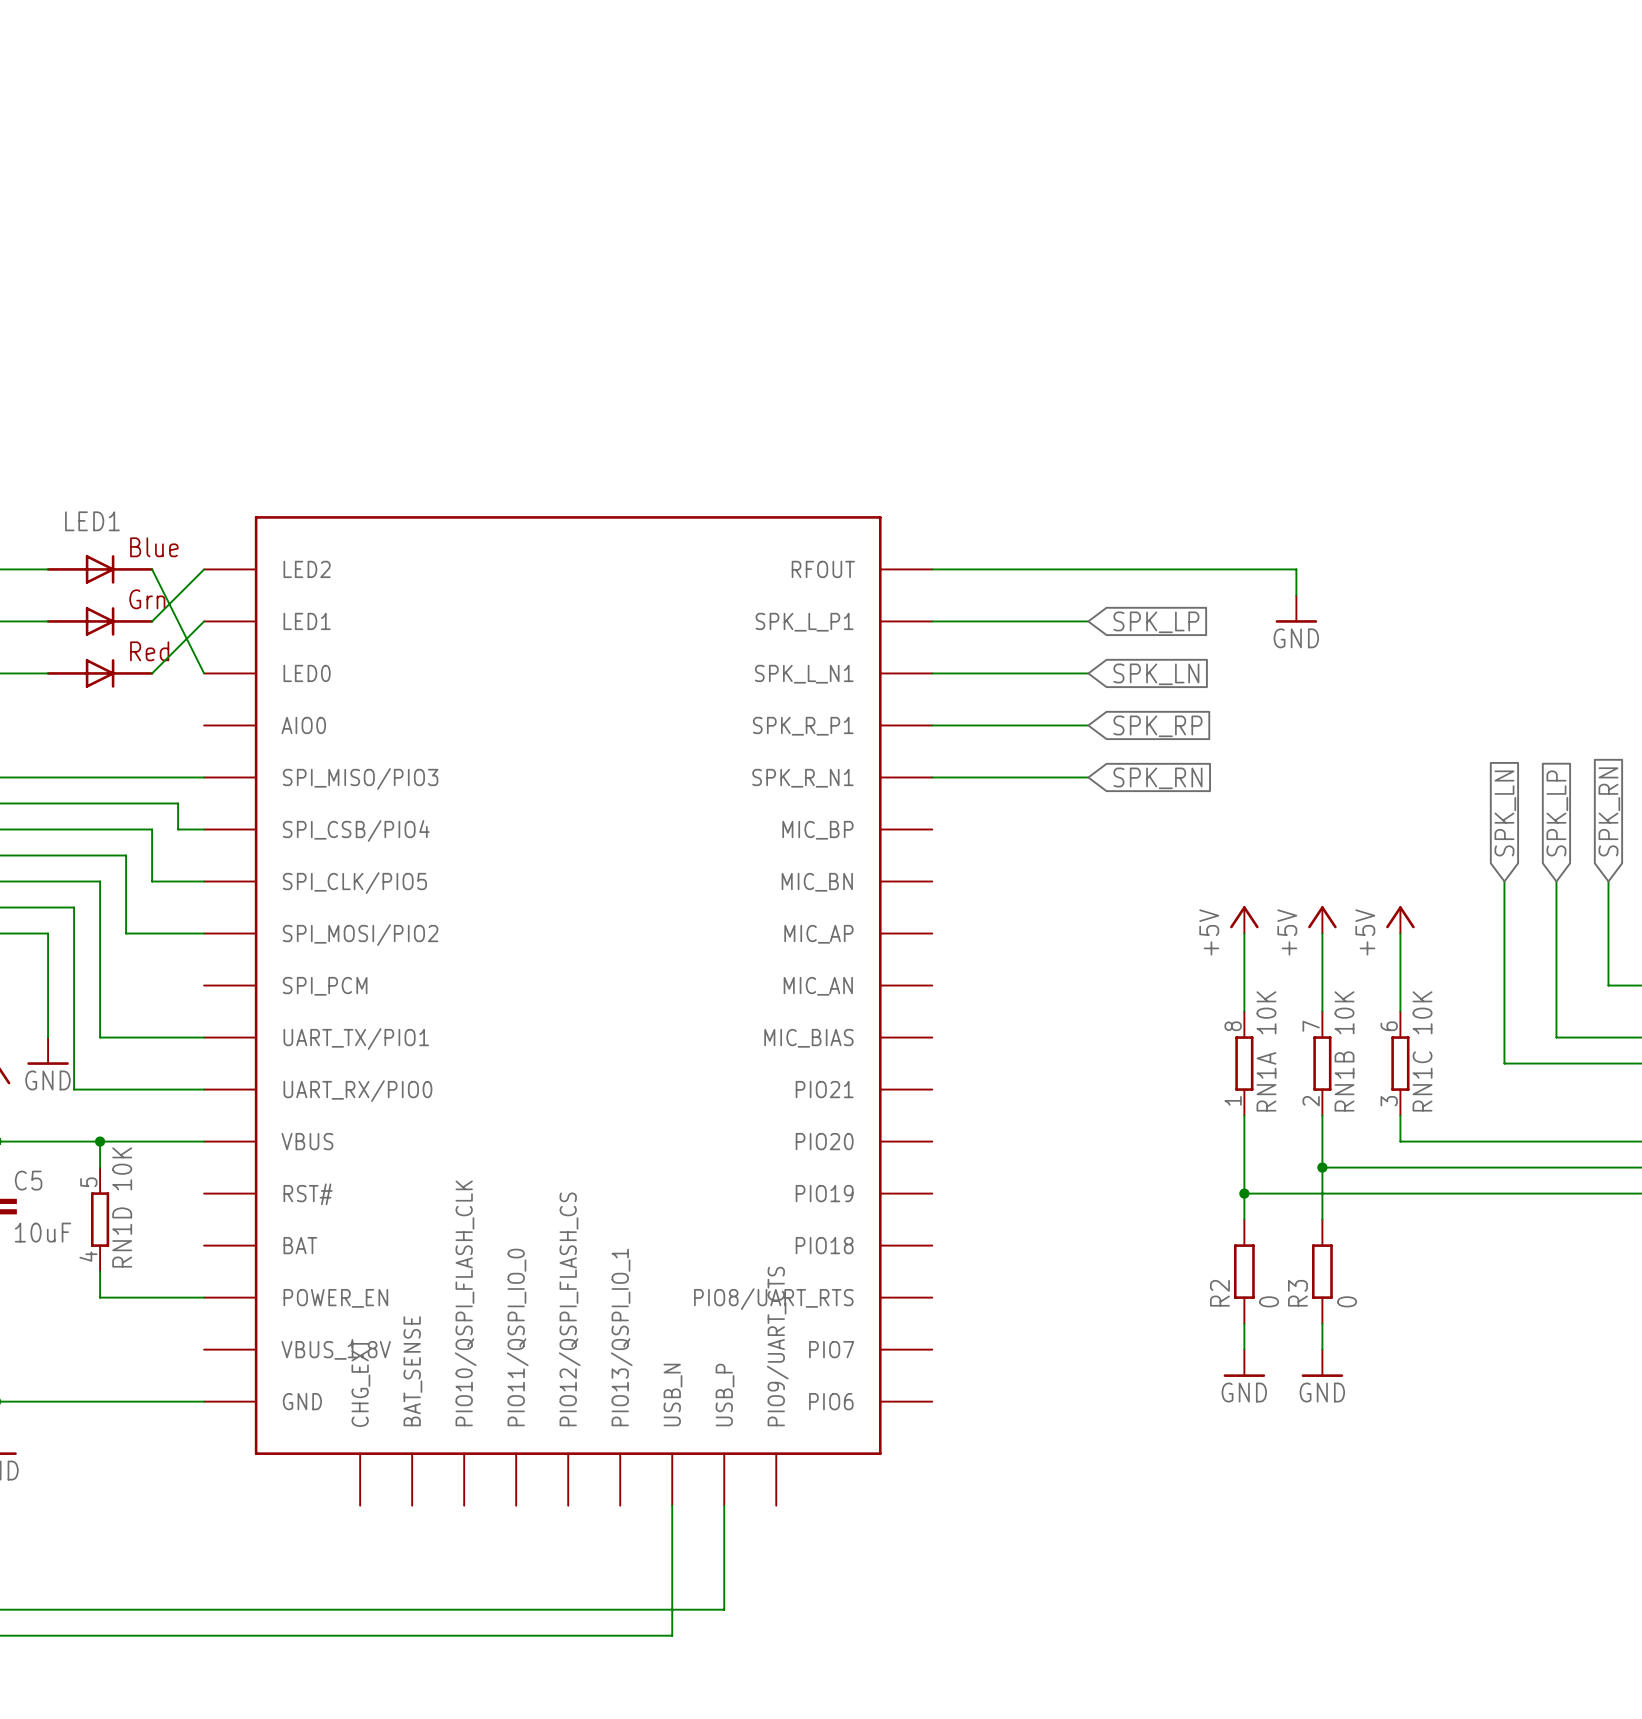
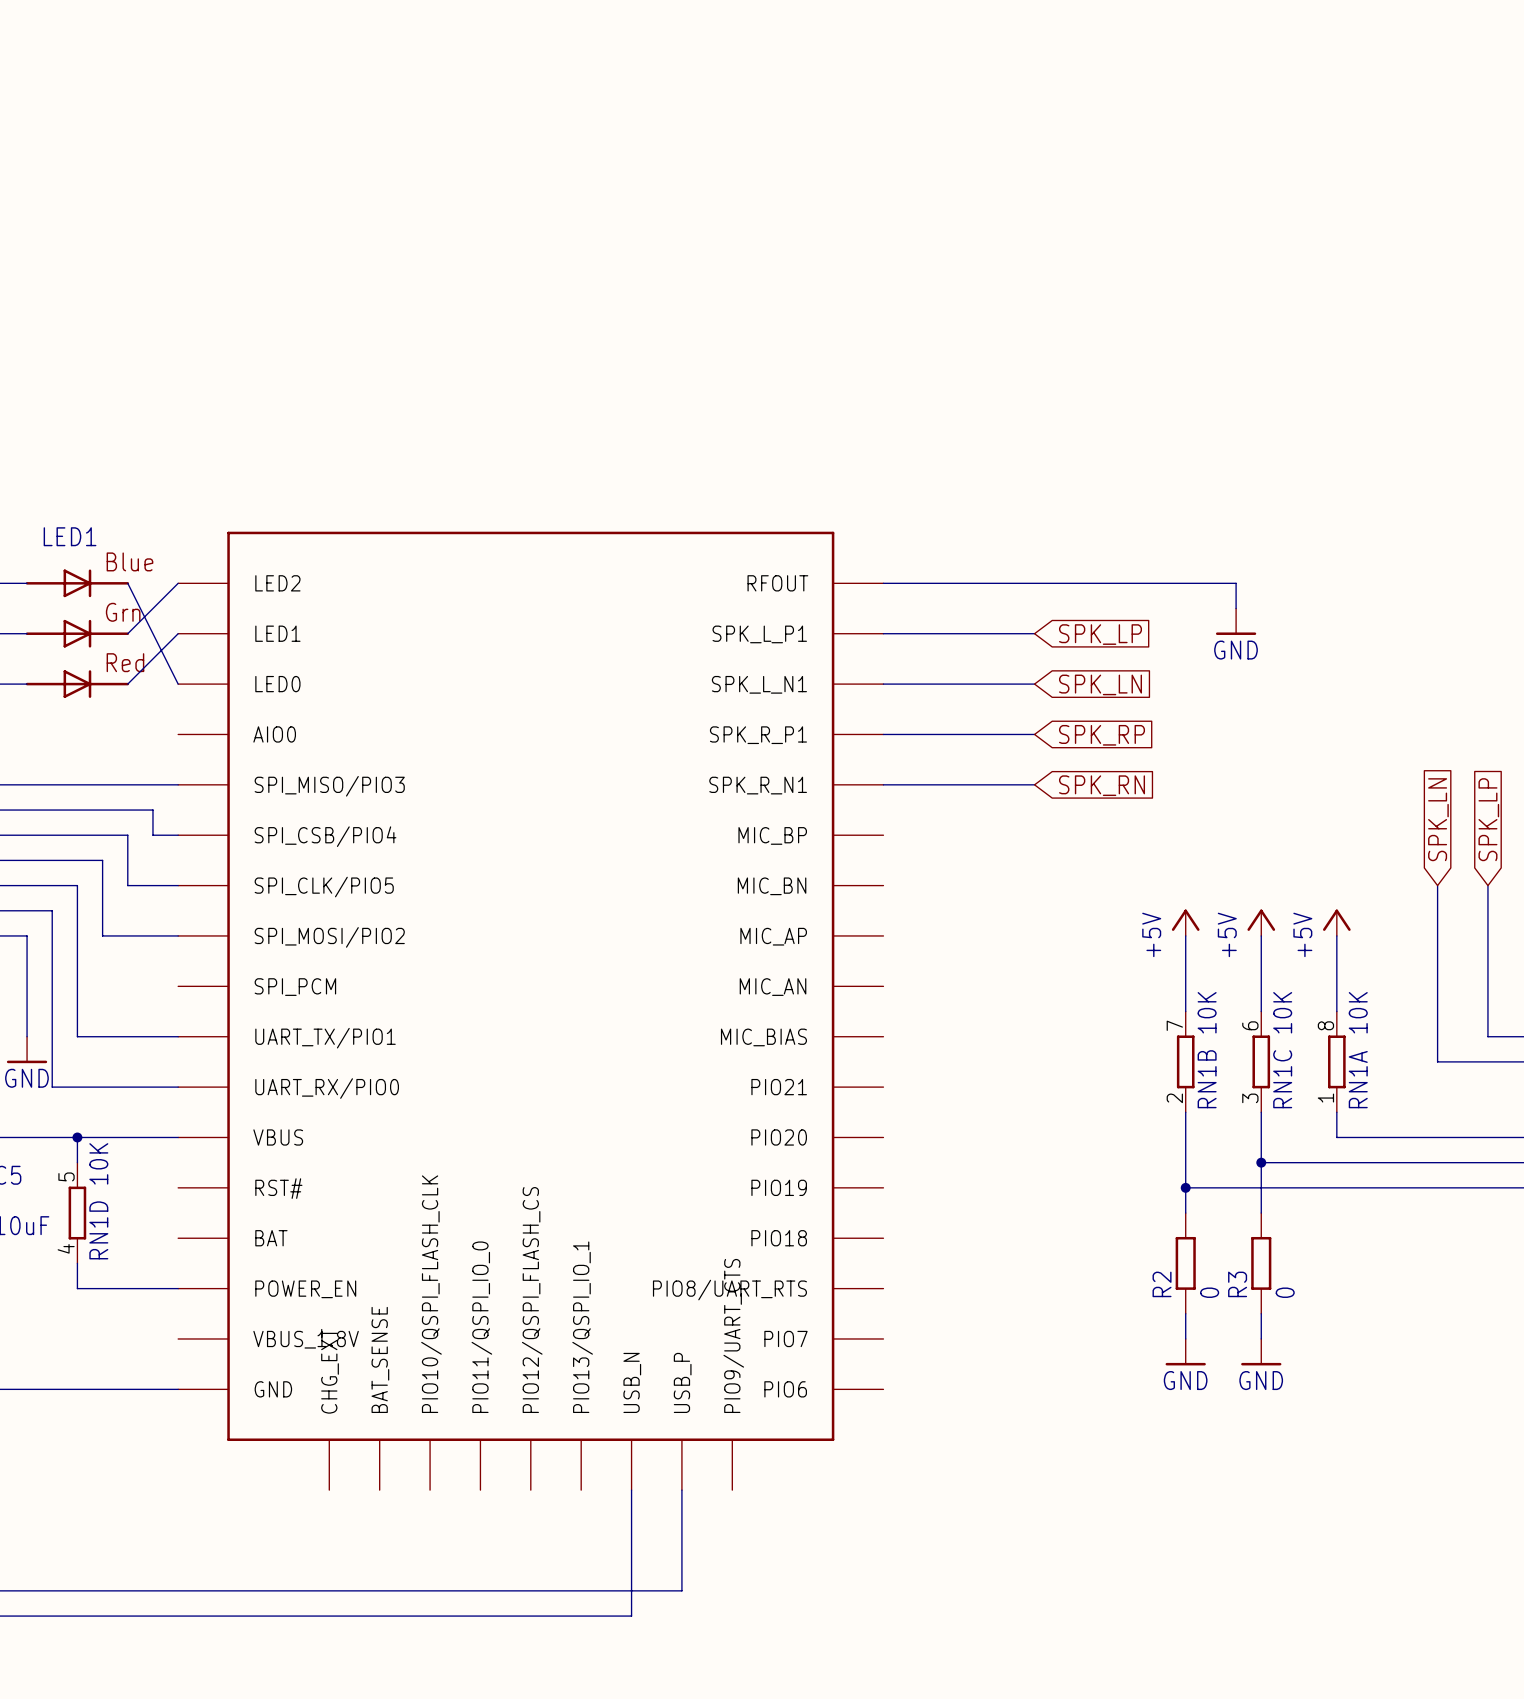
RN1A position: (1244, 1063) -> (1336, 1061)
RN1B position: (1322, 1063) -> (1185, 1061)
RN1C position: (1400, 1063) -> (1261, 1061)

